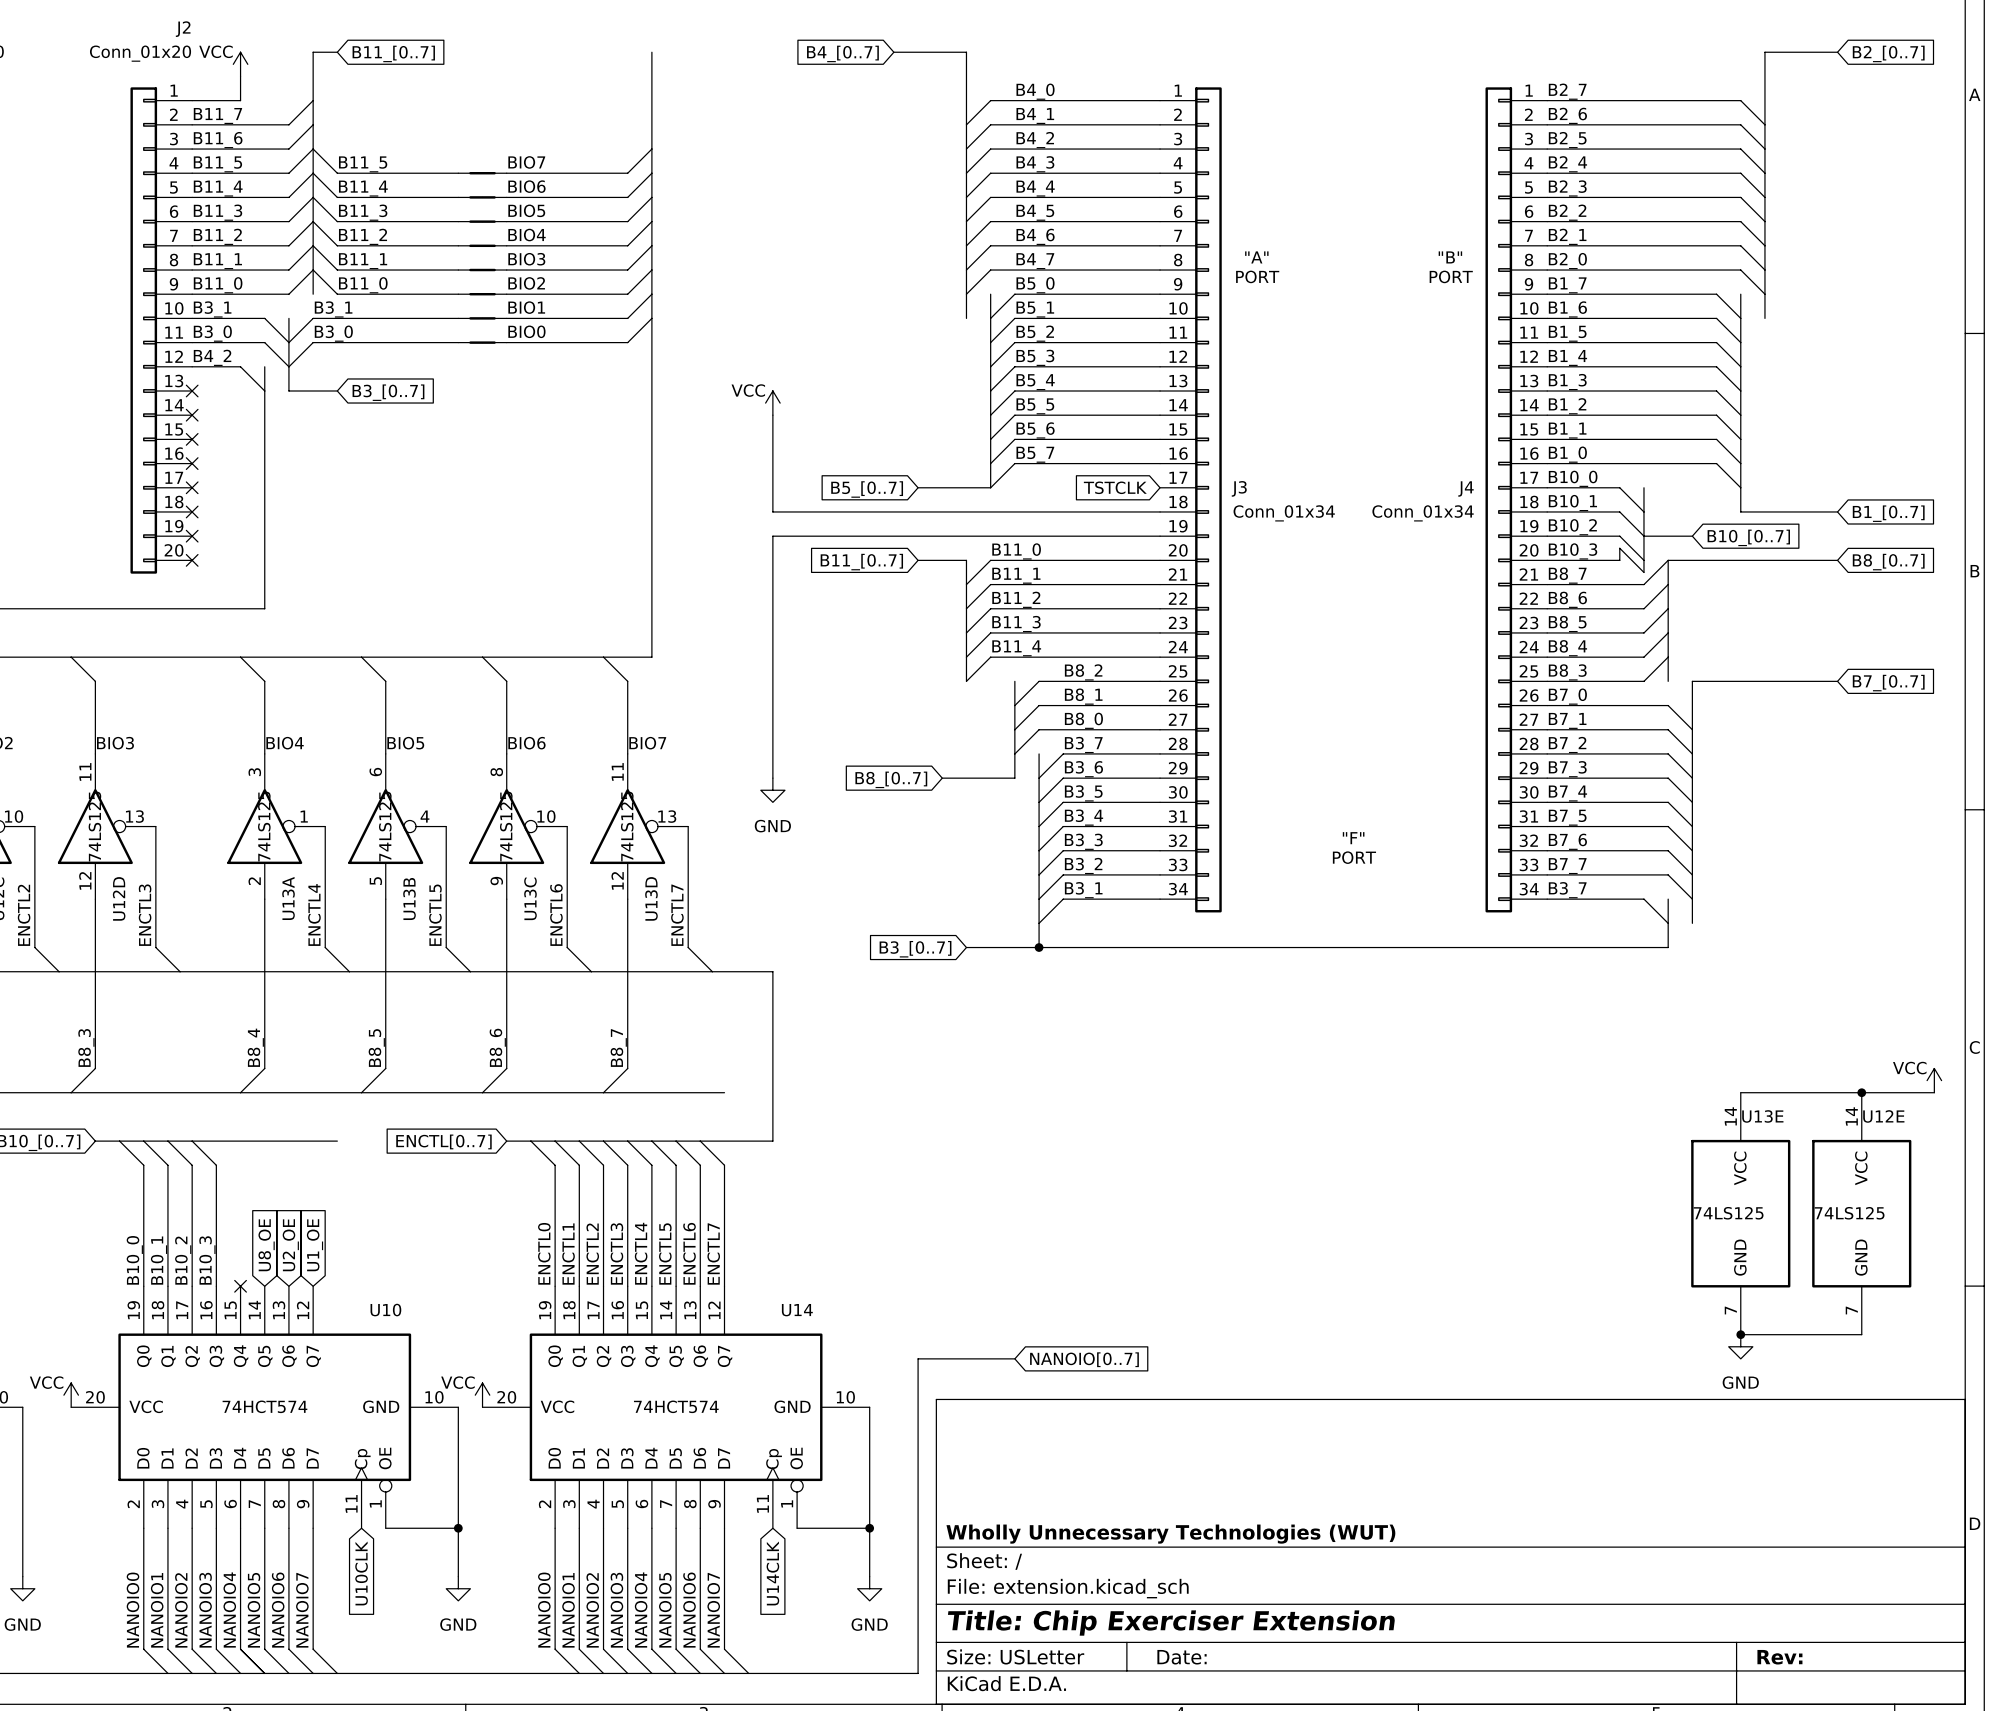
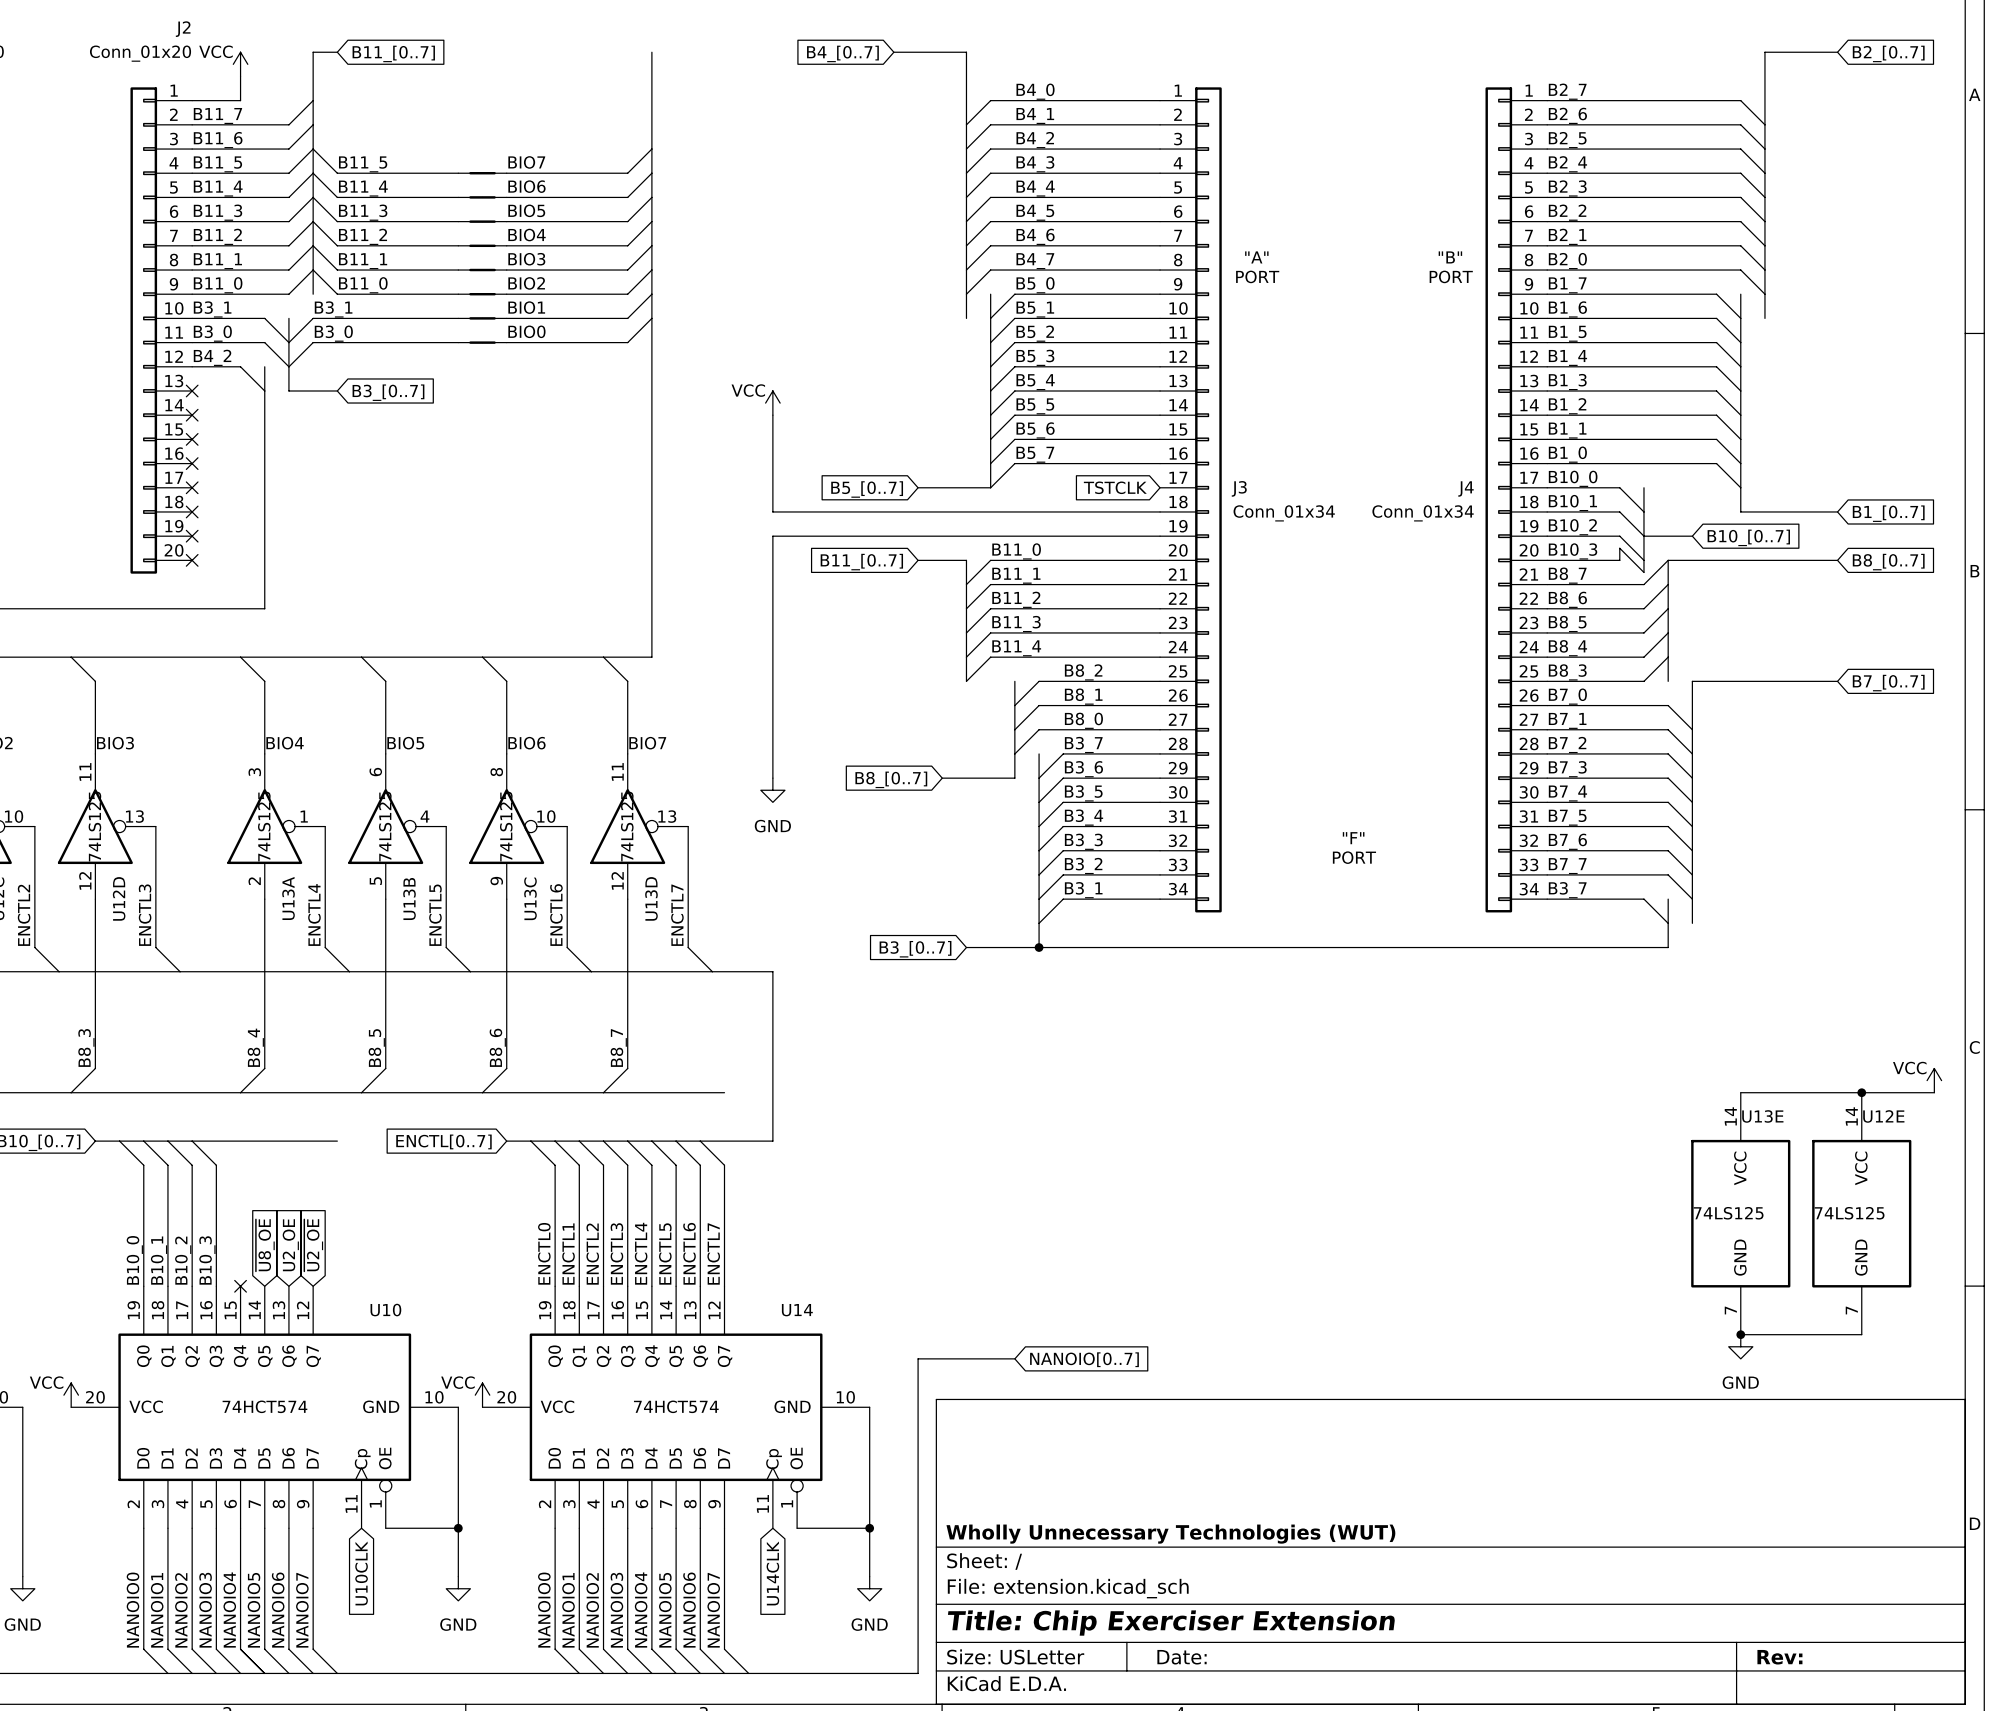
global label: U8_OE (266, 1245) -> ~{U8_OE} (265, 1245)
global label: U1_OE (314, 1245) -> ~{U2_OE} (313, 1245)

